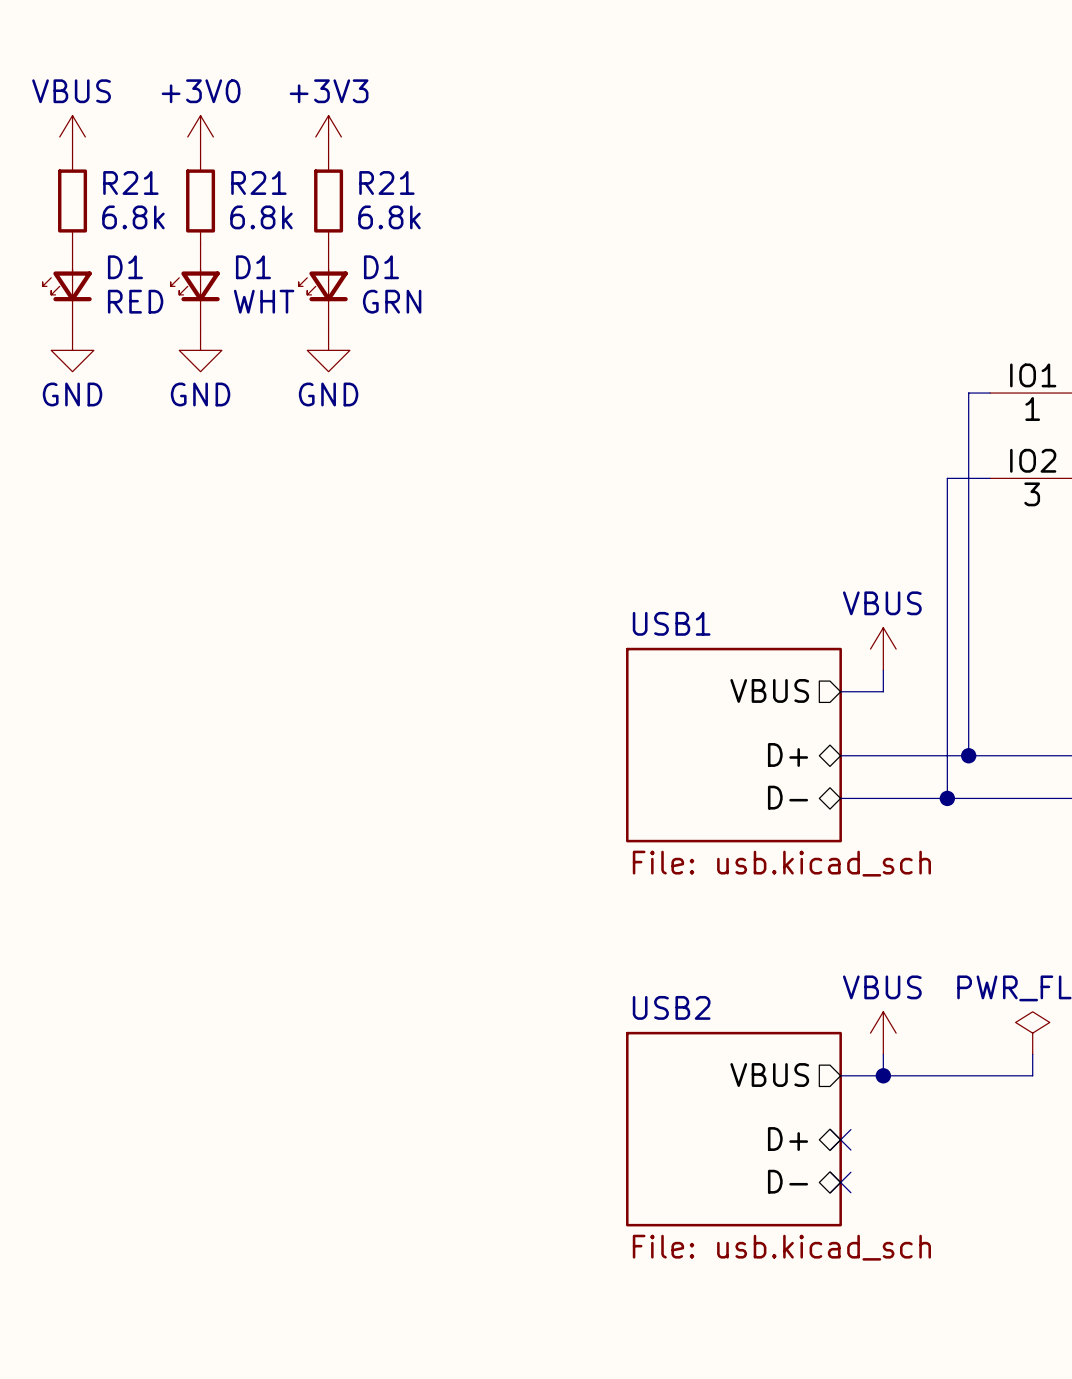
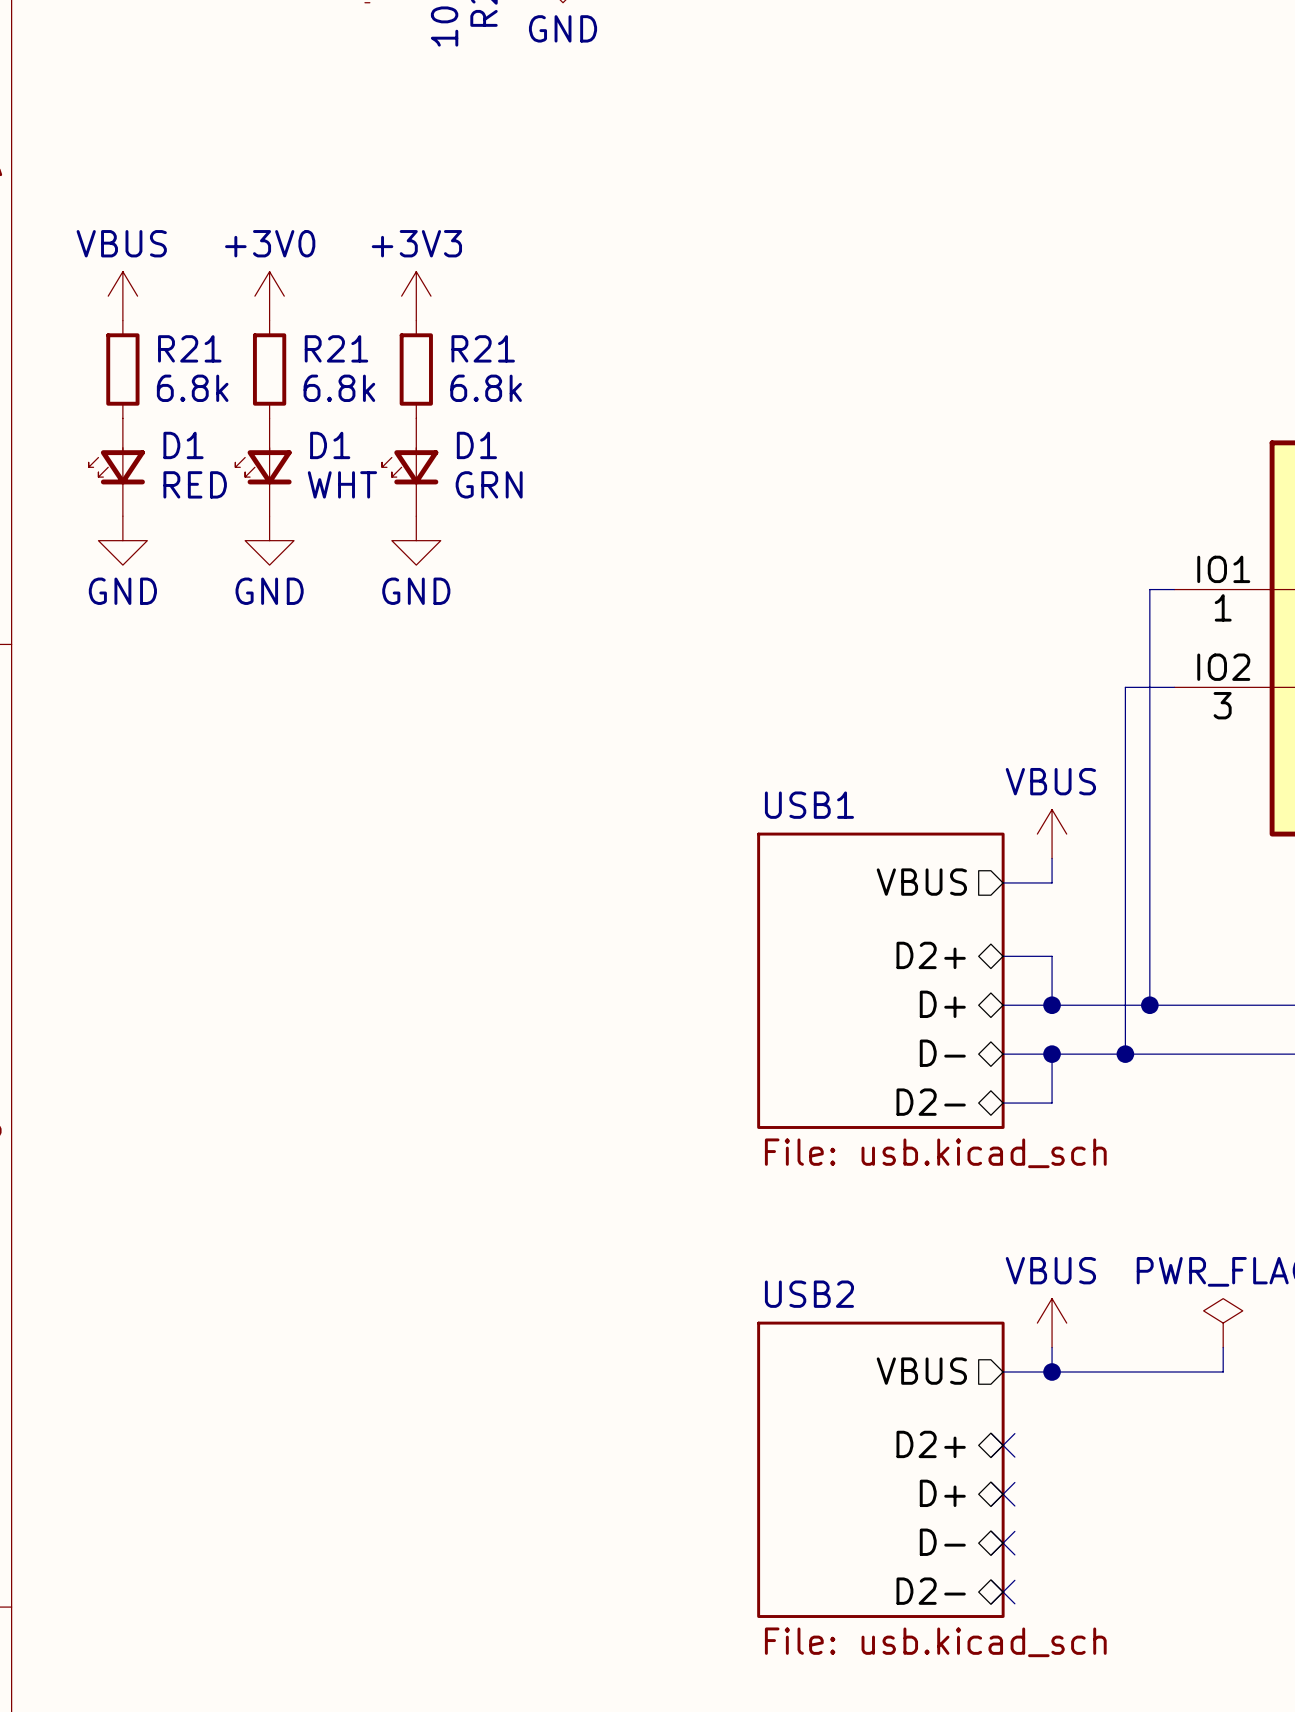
sheet USB1 shape: [626, 647, 842, 843] -> [757, 832, 1005, 1129]
power symbol position: VBUS (883, 649) -> VBUS (1052, 834)
wire: (883, 670) (883, 691) (840, 691) -> (1052, 858) (1052, 882) (1003, 882)
sheet pin position: VBUS (769, 690) -> VBUS (921, 882)
sheet pin: none -> D2+ (931, 955)
wire: none -> (1003, 956) (1052, 956) (1052, 1005)
junction: none -> (1052, 1005)
wire: none -> (1052, 1054) (1052, 1103) (1003, 1103)
junction: none -> (1052, 1054)
sheet pin: none -> D2- (931, 1102)
sheet USB2 shape: [626, 1031, 842, 1227] -> [757, 1321, 1005, 1618]
sheet pin: D+ (788, 1139) -> D2+ (931, 1444)
sheet pin: D- (788, 1181) -> D+ (942, 1493)
sheet pin: none -> D- (942, 1542)
no-connect mark: none -> (1003, 1543)
sheet pin: none -> D2- (931, 1591)
no-connect mark: none -> (1003, 1592)

